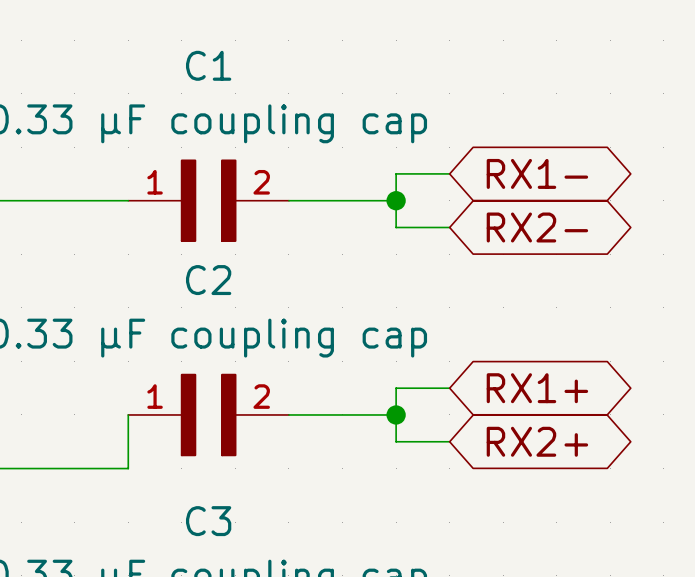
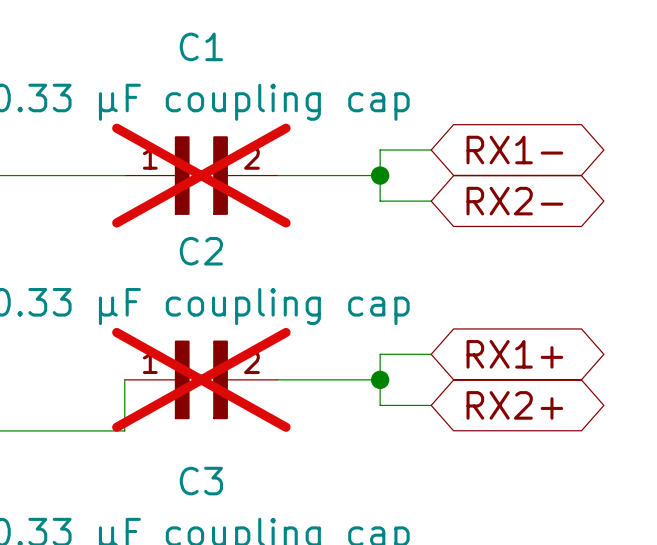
C1 do-not-place cross: none -> (201, 175)
C2 do-not-place cross: none -> (201, 379)

